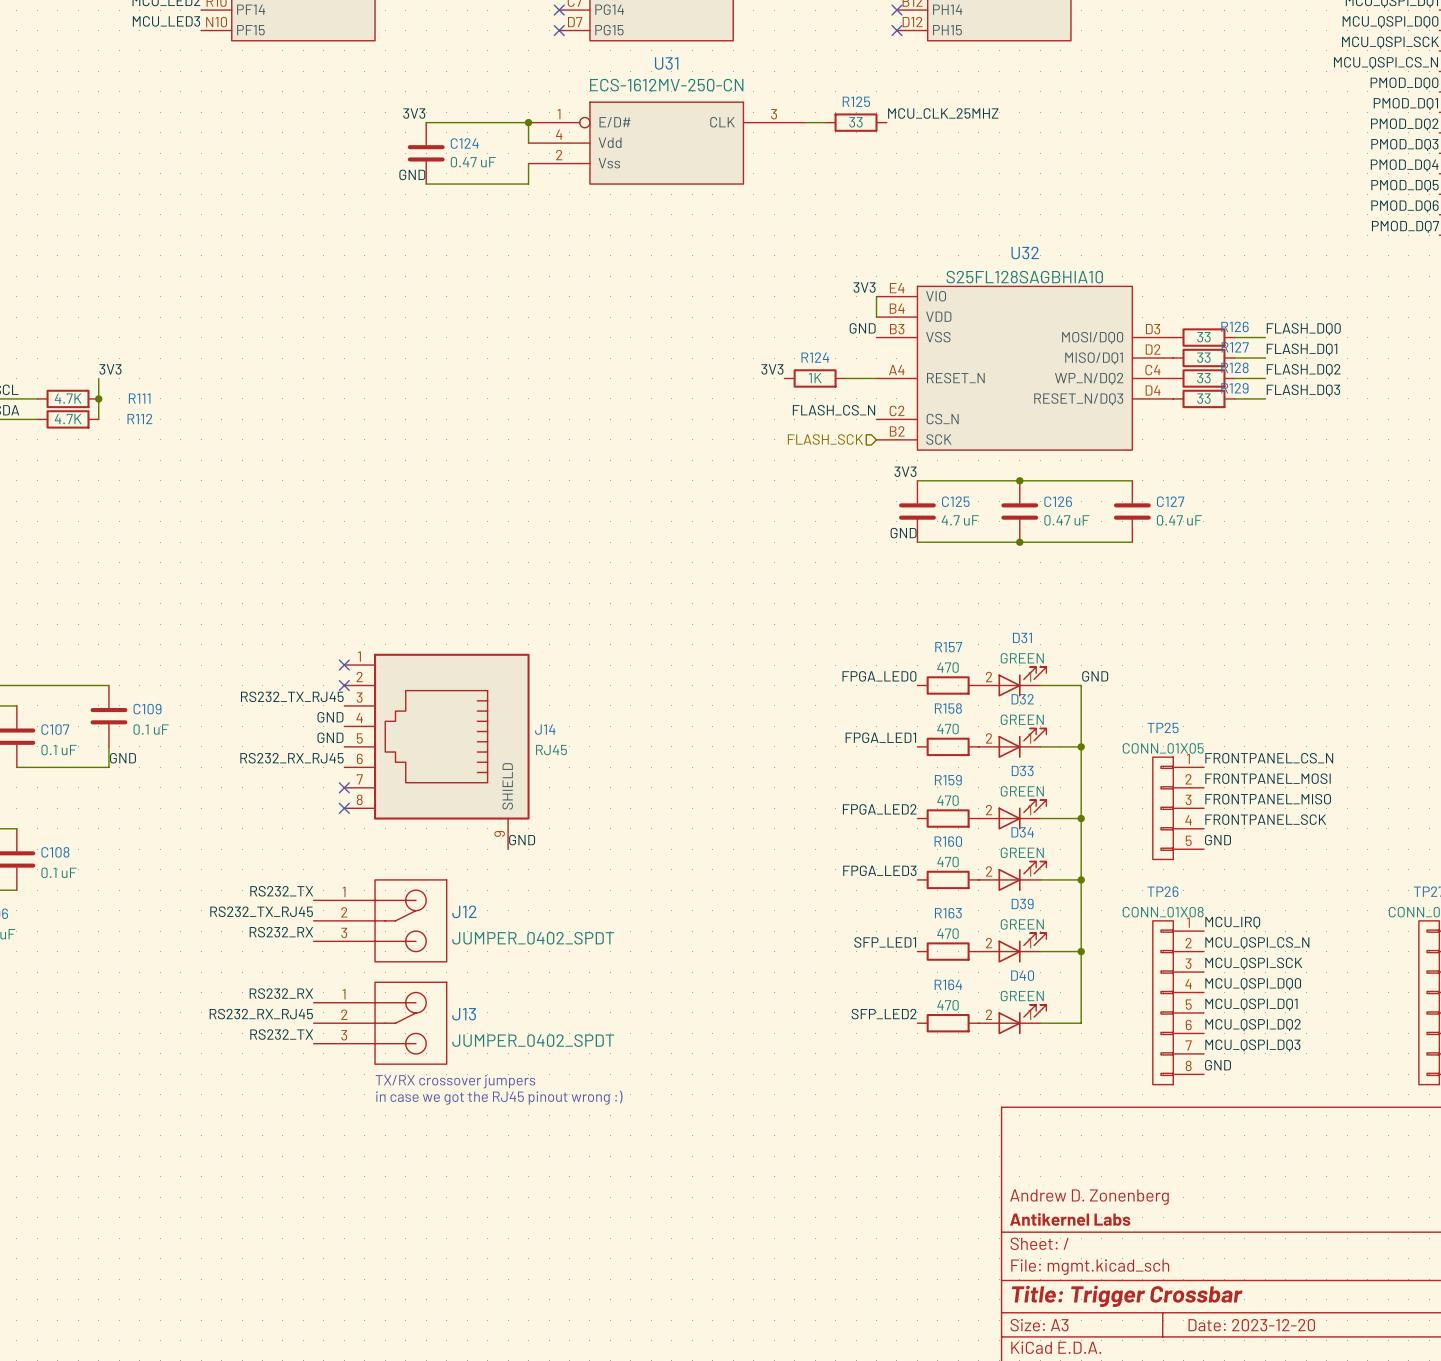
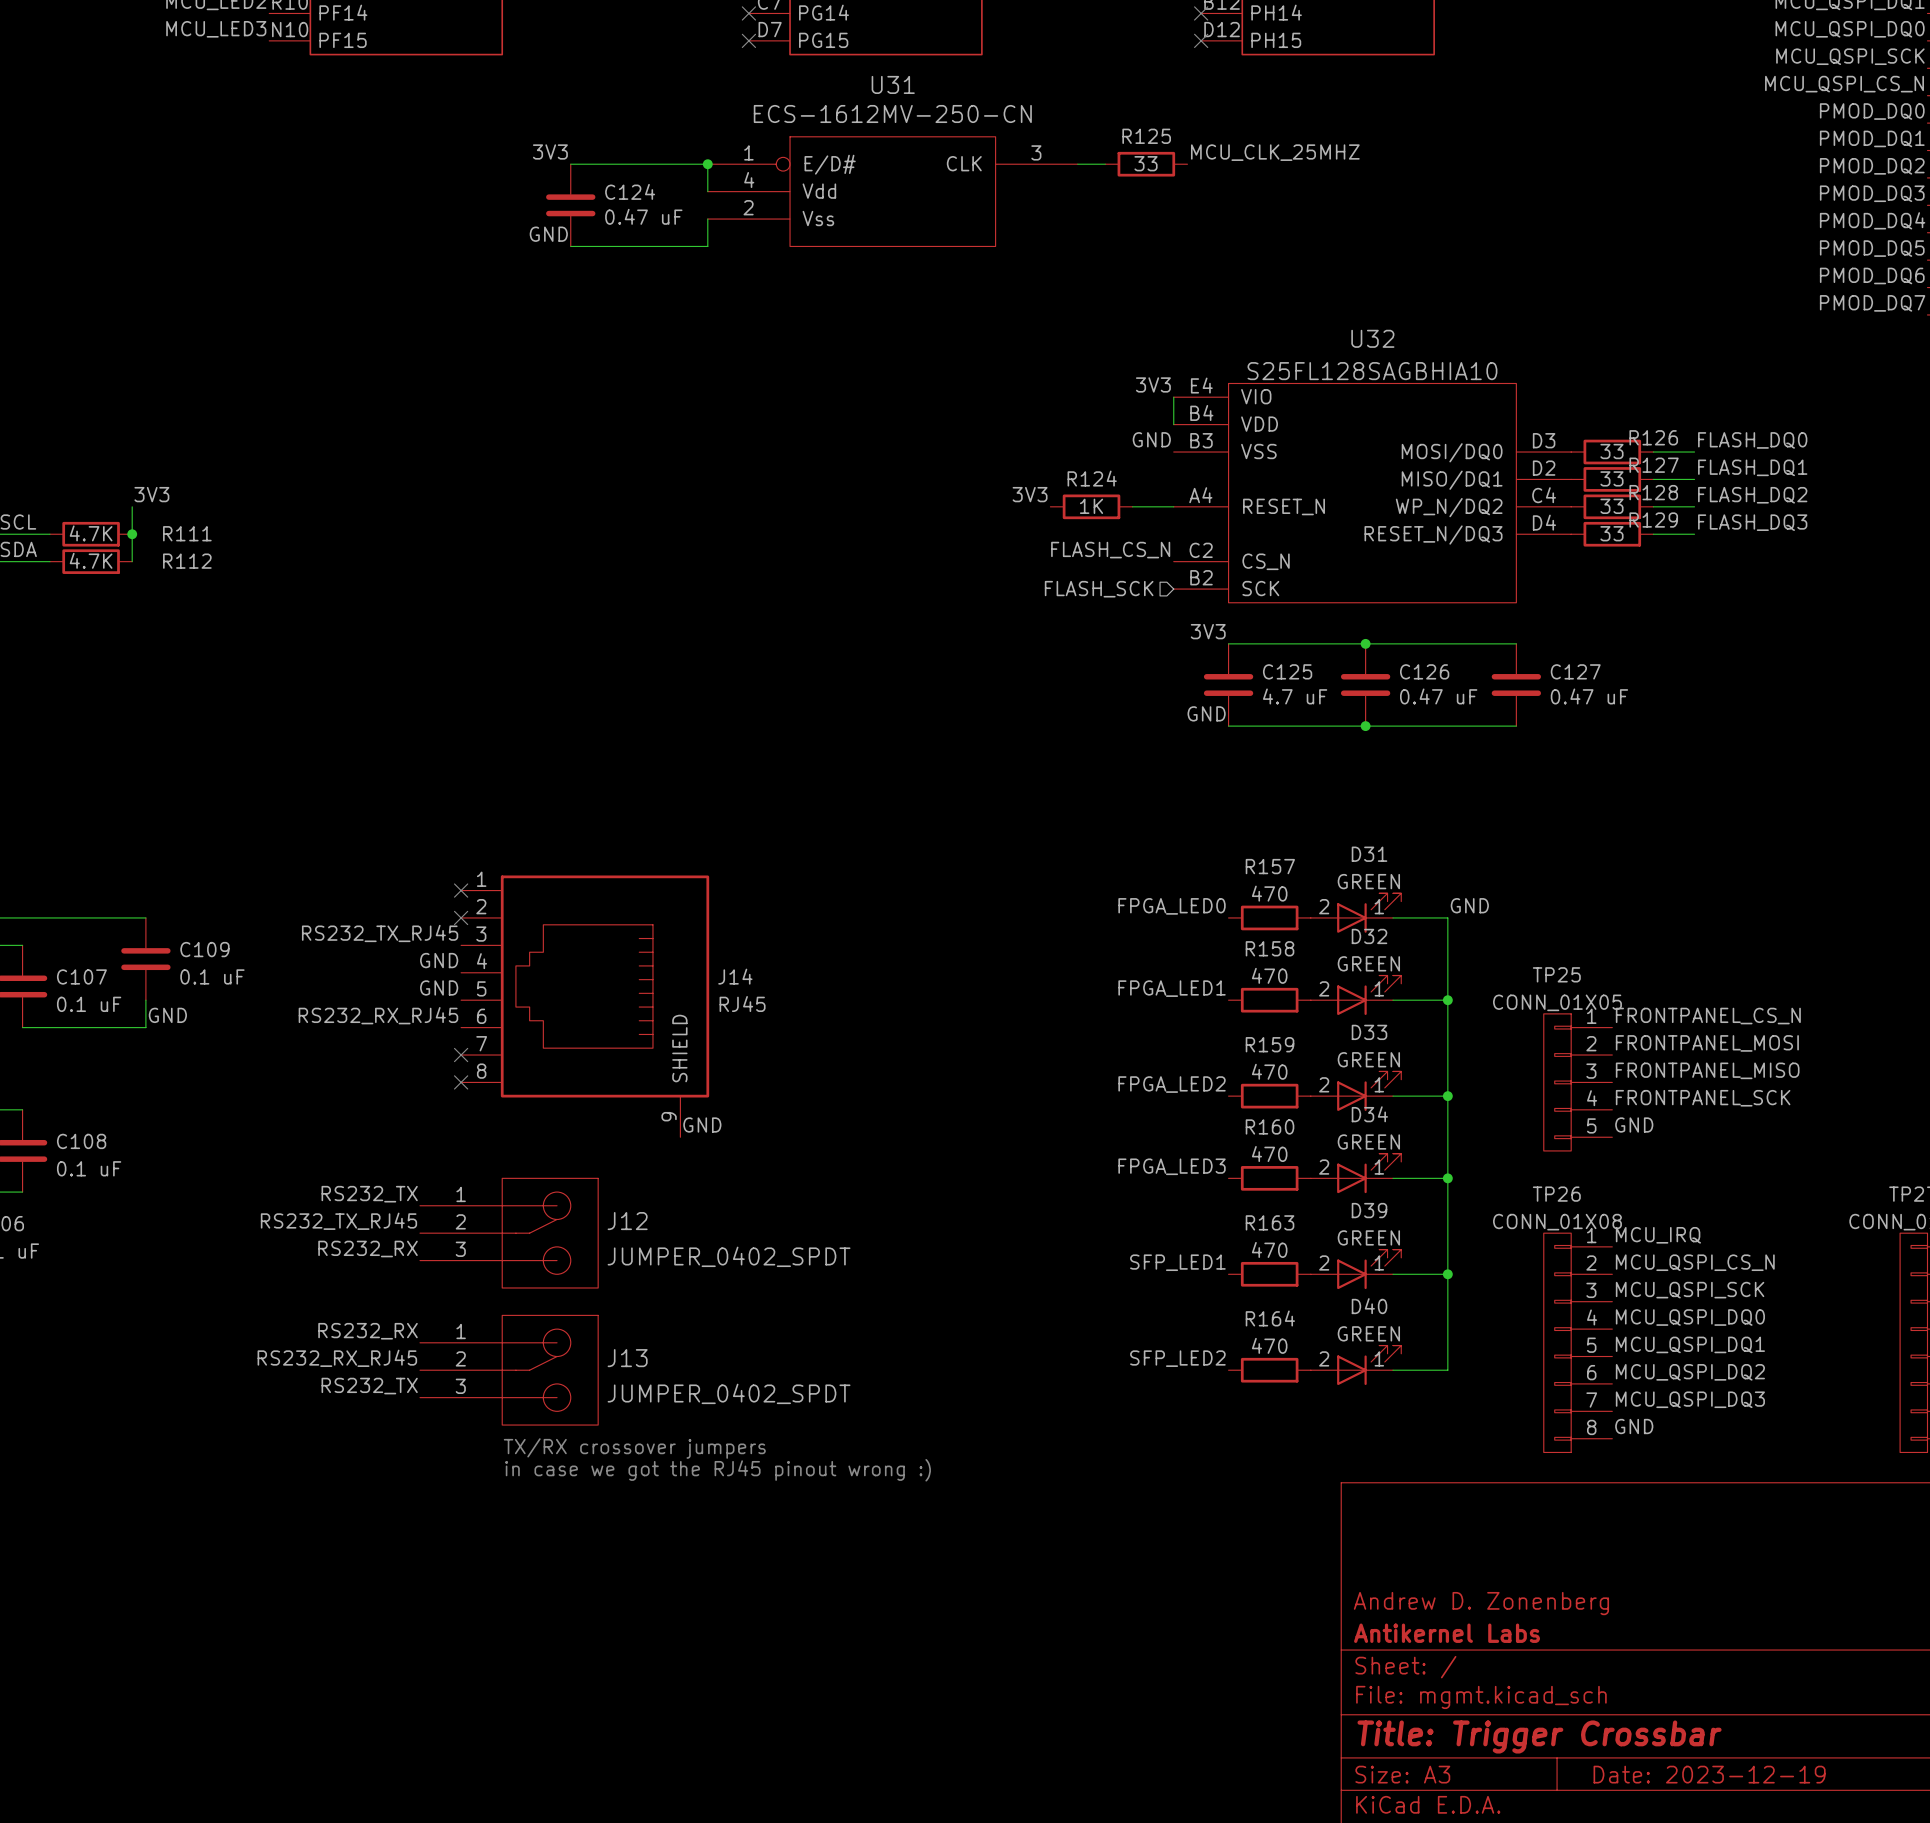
title block: Date: 2023-12-20 (1251, 1325) -> Date: 2023-12-19 (1709, 1774)

